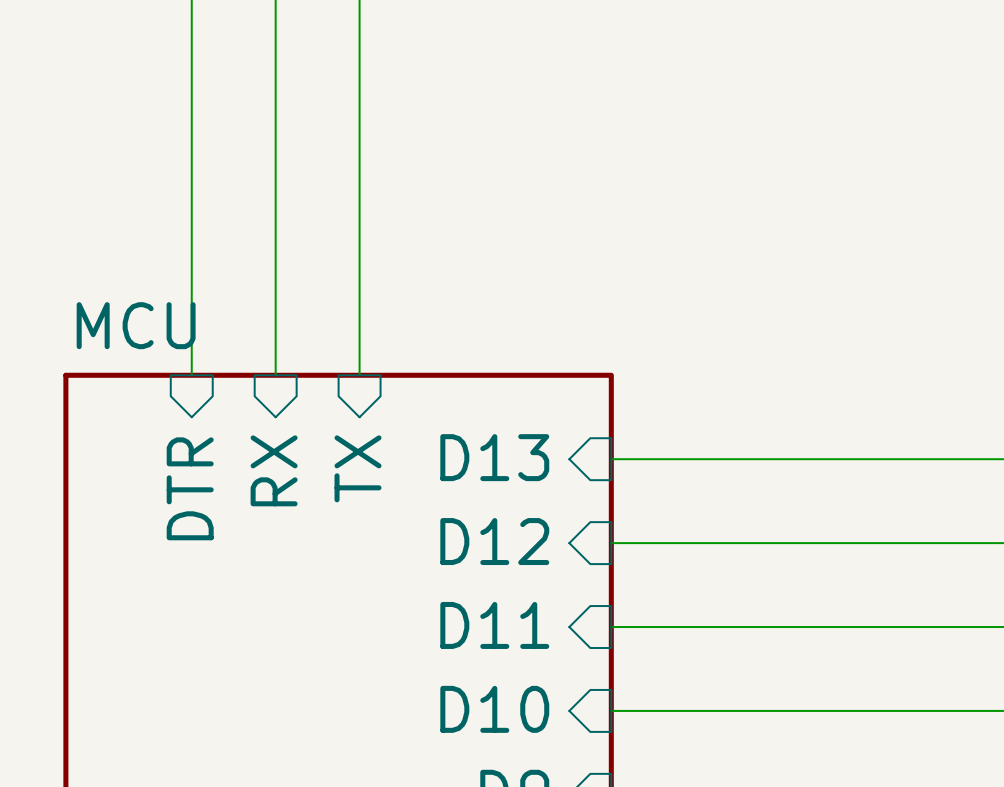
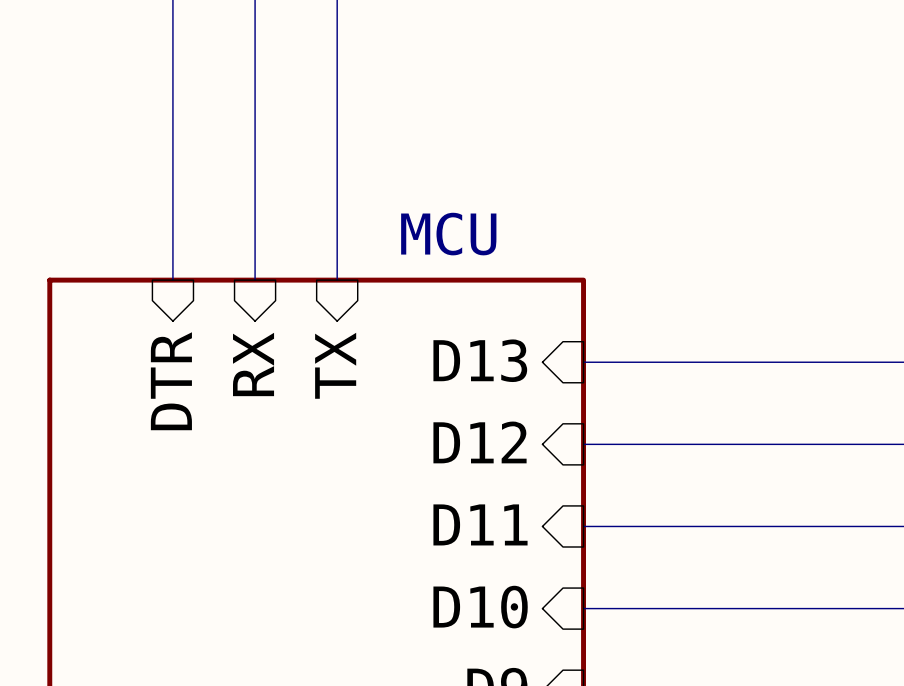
sheet MCU name position: MCU (136, 325) -> MCU (448, 234)

